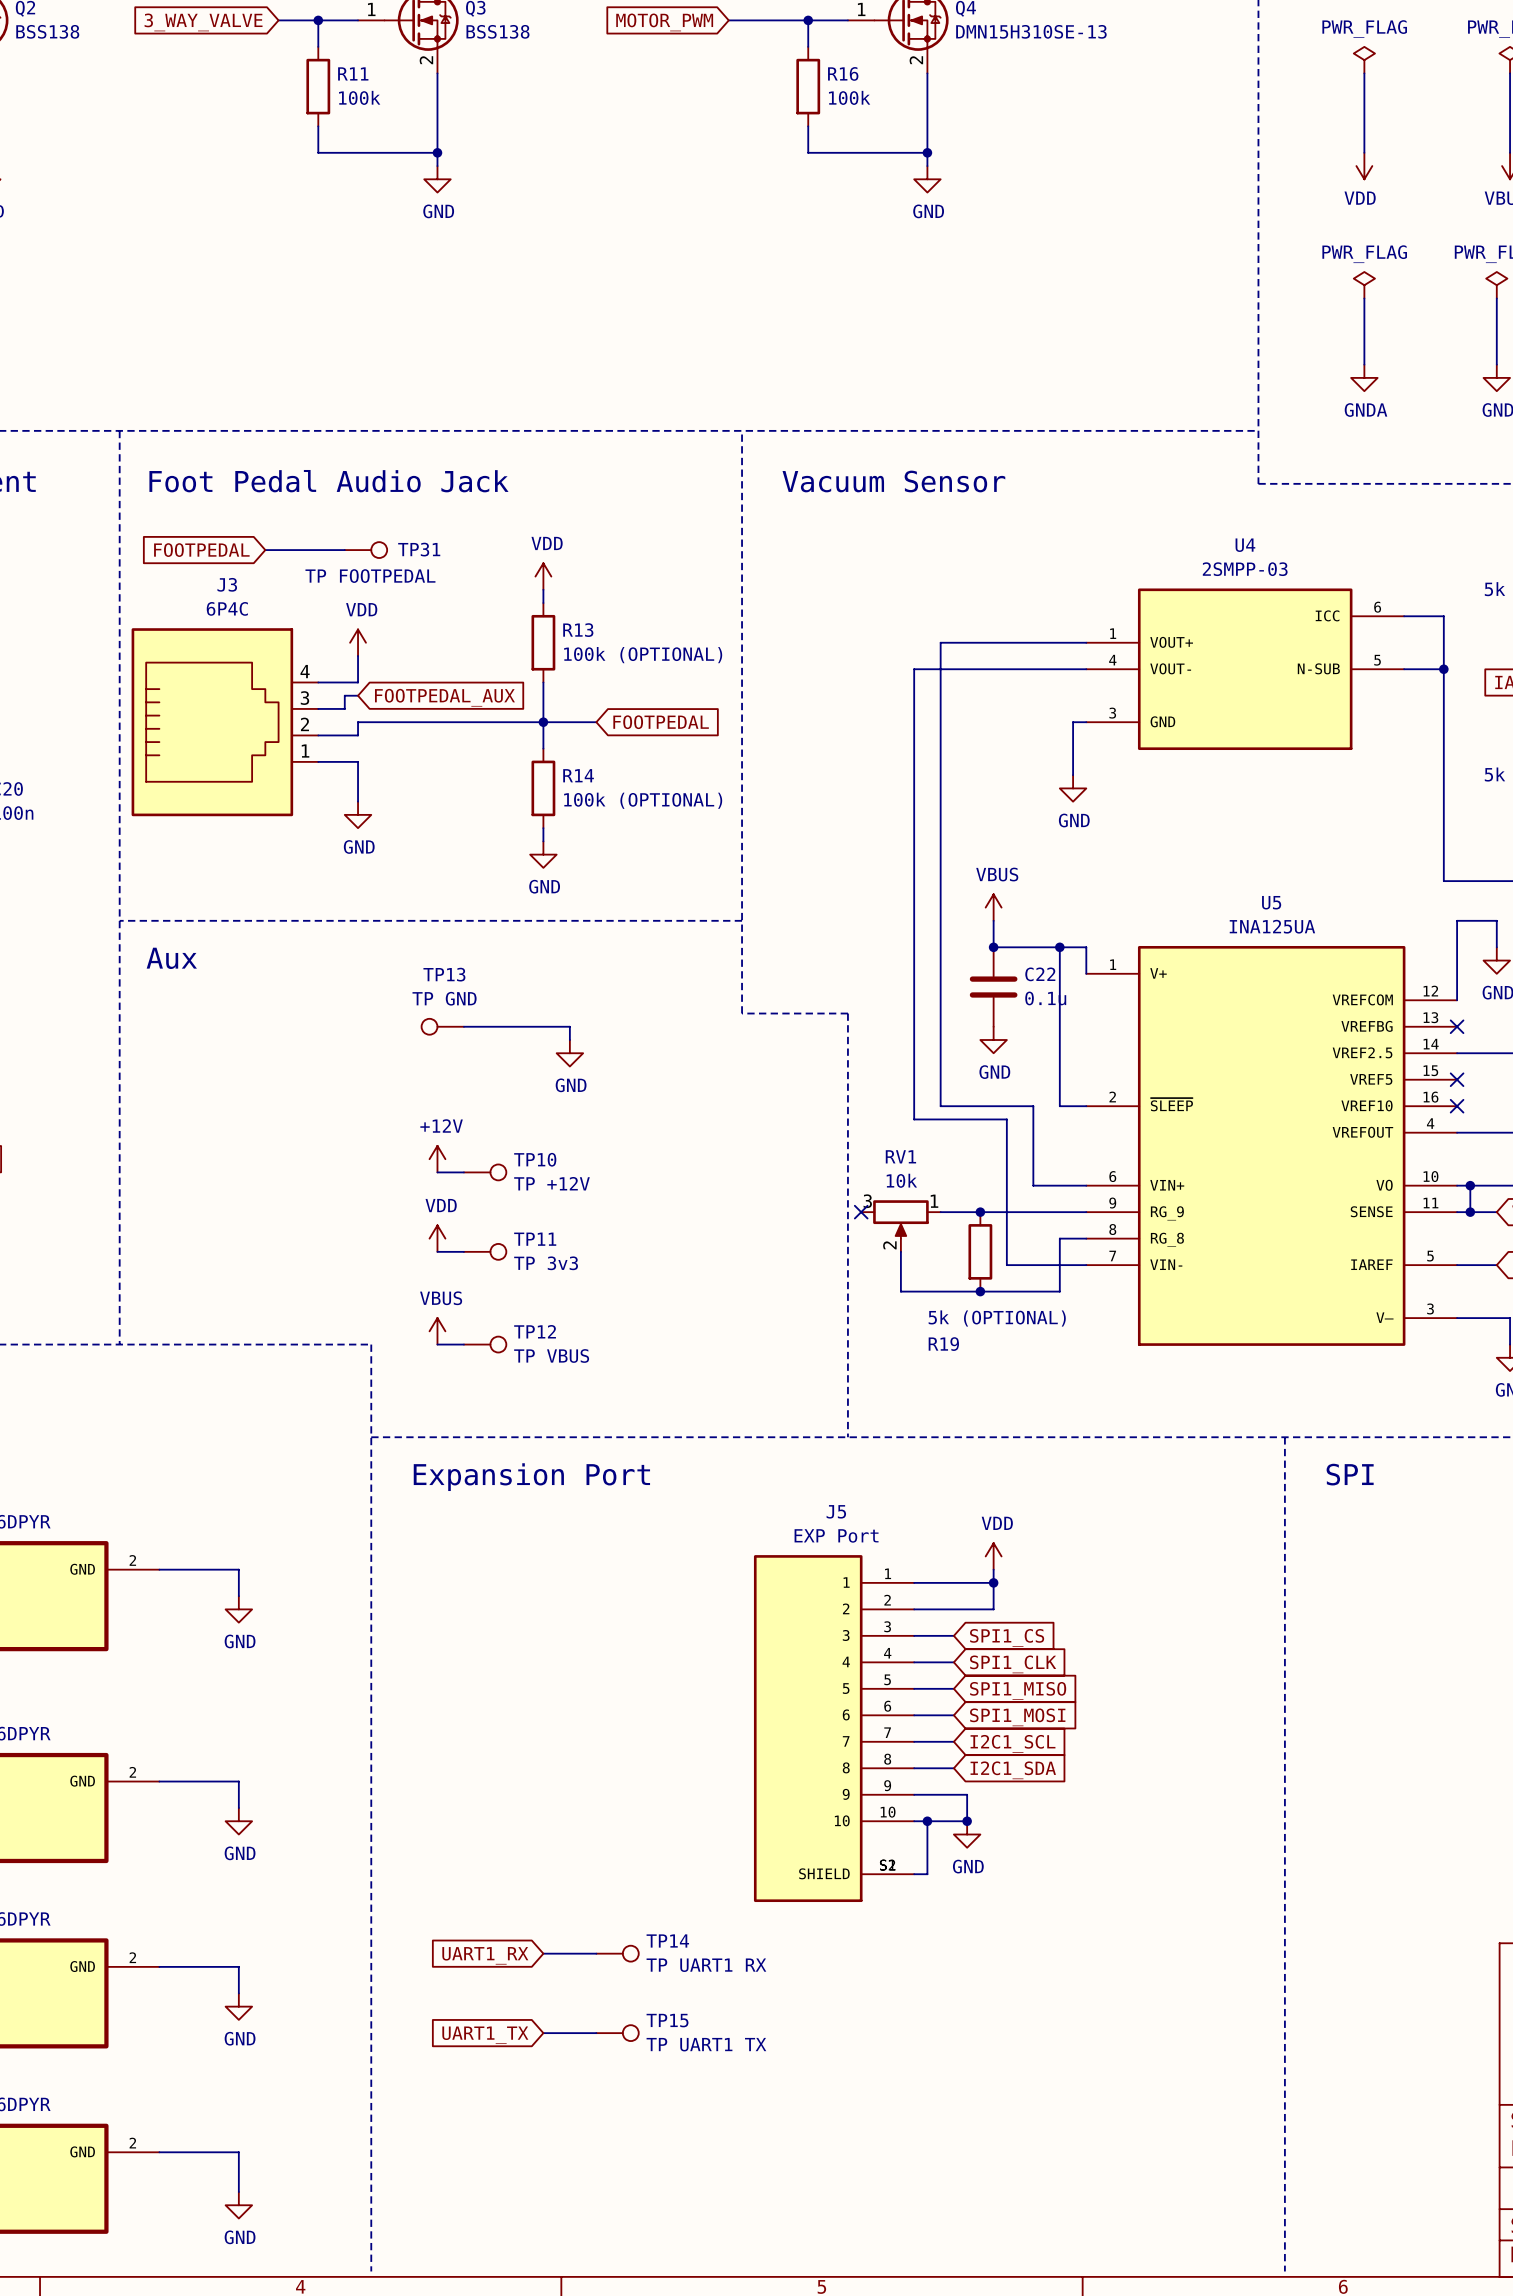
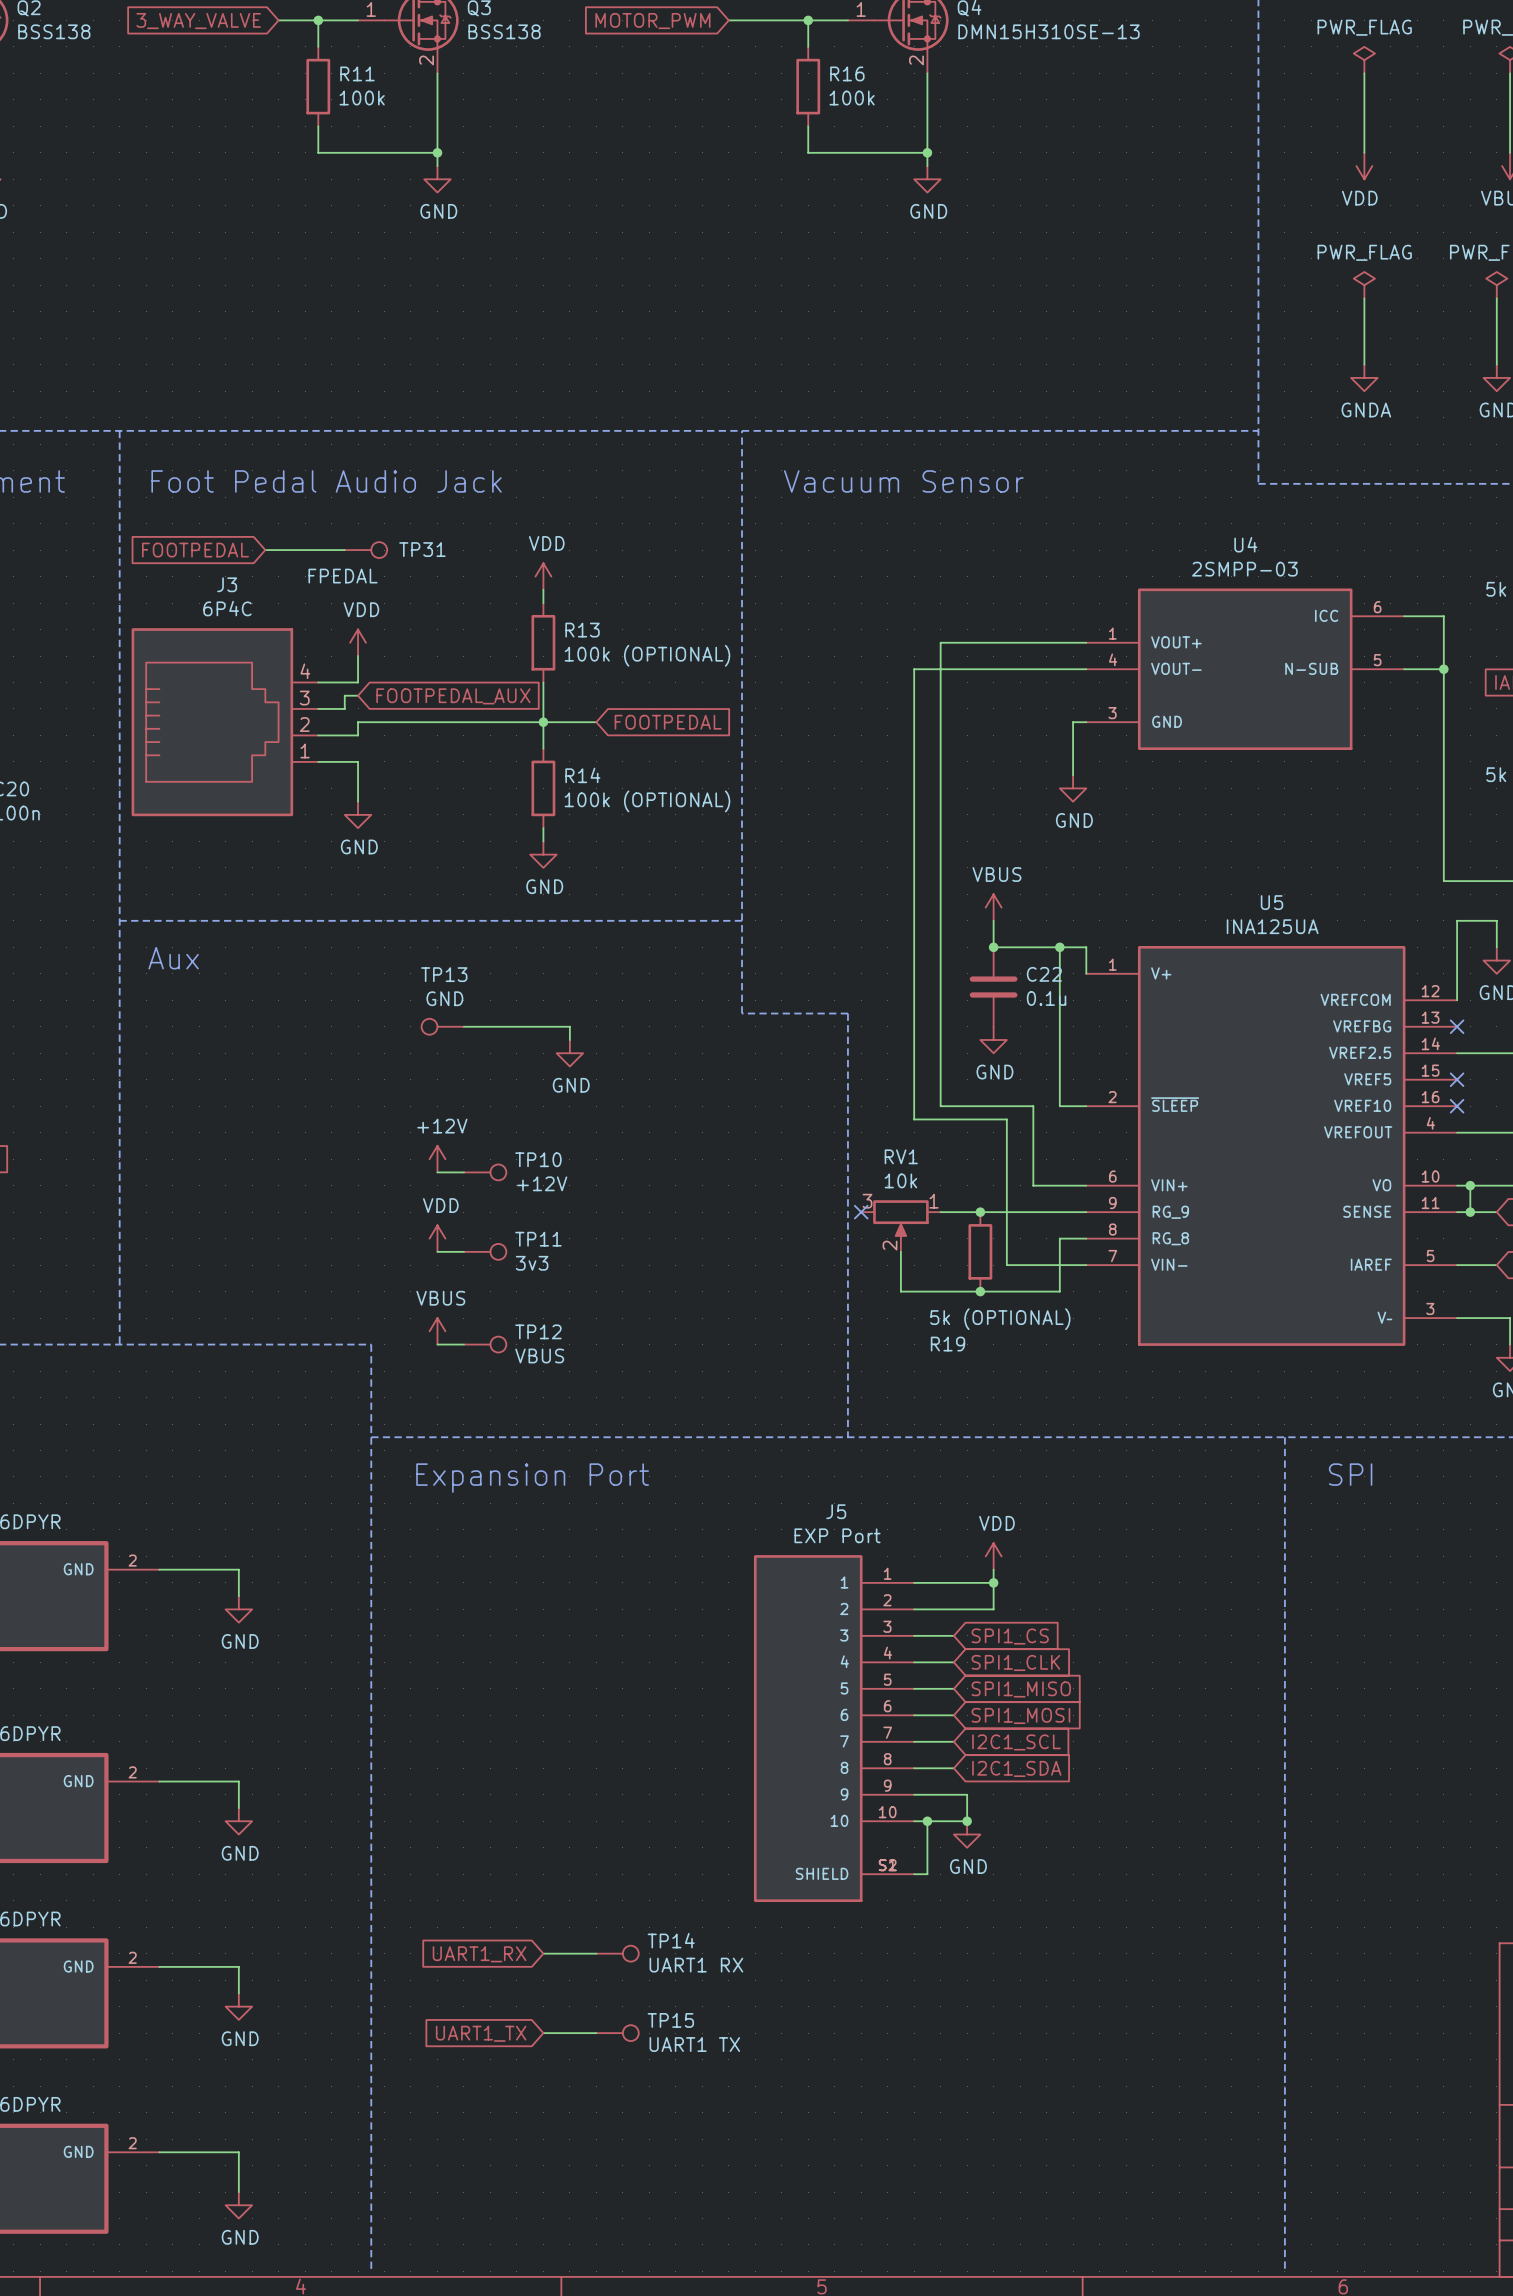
TP31 value: TP FOOTPEDAL (370, 576) -> FPEDAL (342, 576)
TP13 value: TP GND (444, 998) -> GND (444, 998)
TP10 value: TP +12V (551, 1183) -> +12V (542, 1183)
TP11 value: TP 3v3 (546, 1263) -> 3v3 (532, 1263)
TP12 value: TP VBUS (551, 1355) -> VBUS (539, 1355)
TP14 value: TP UART1 RX (706, 1965) -> UART1 RX (696, 1965)
TP15 value: TP UART1 TX (706, 2044) -> UART1 TX (694, 2044)

